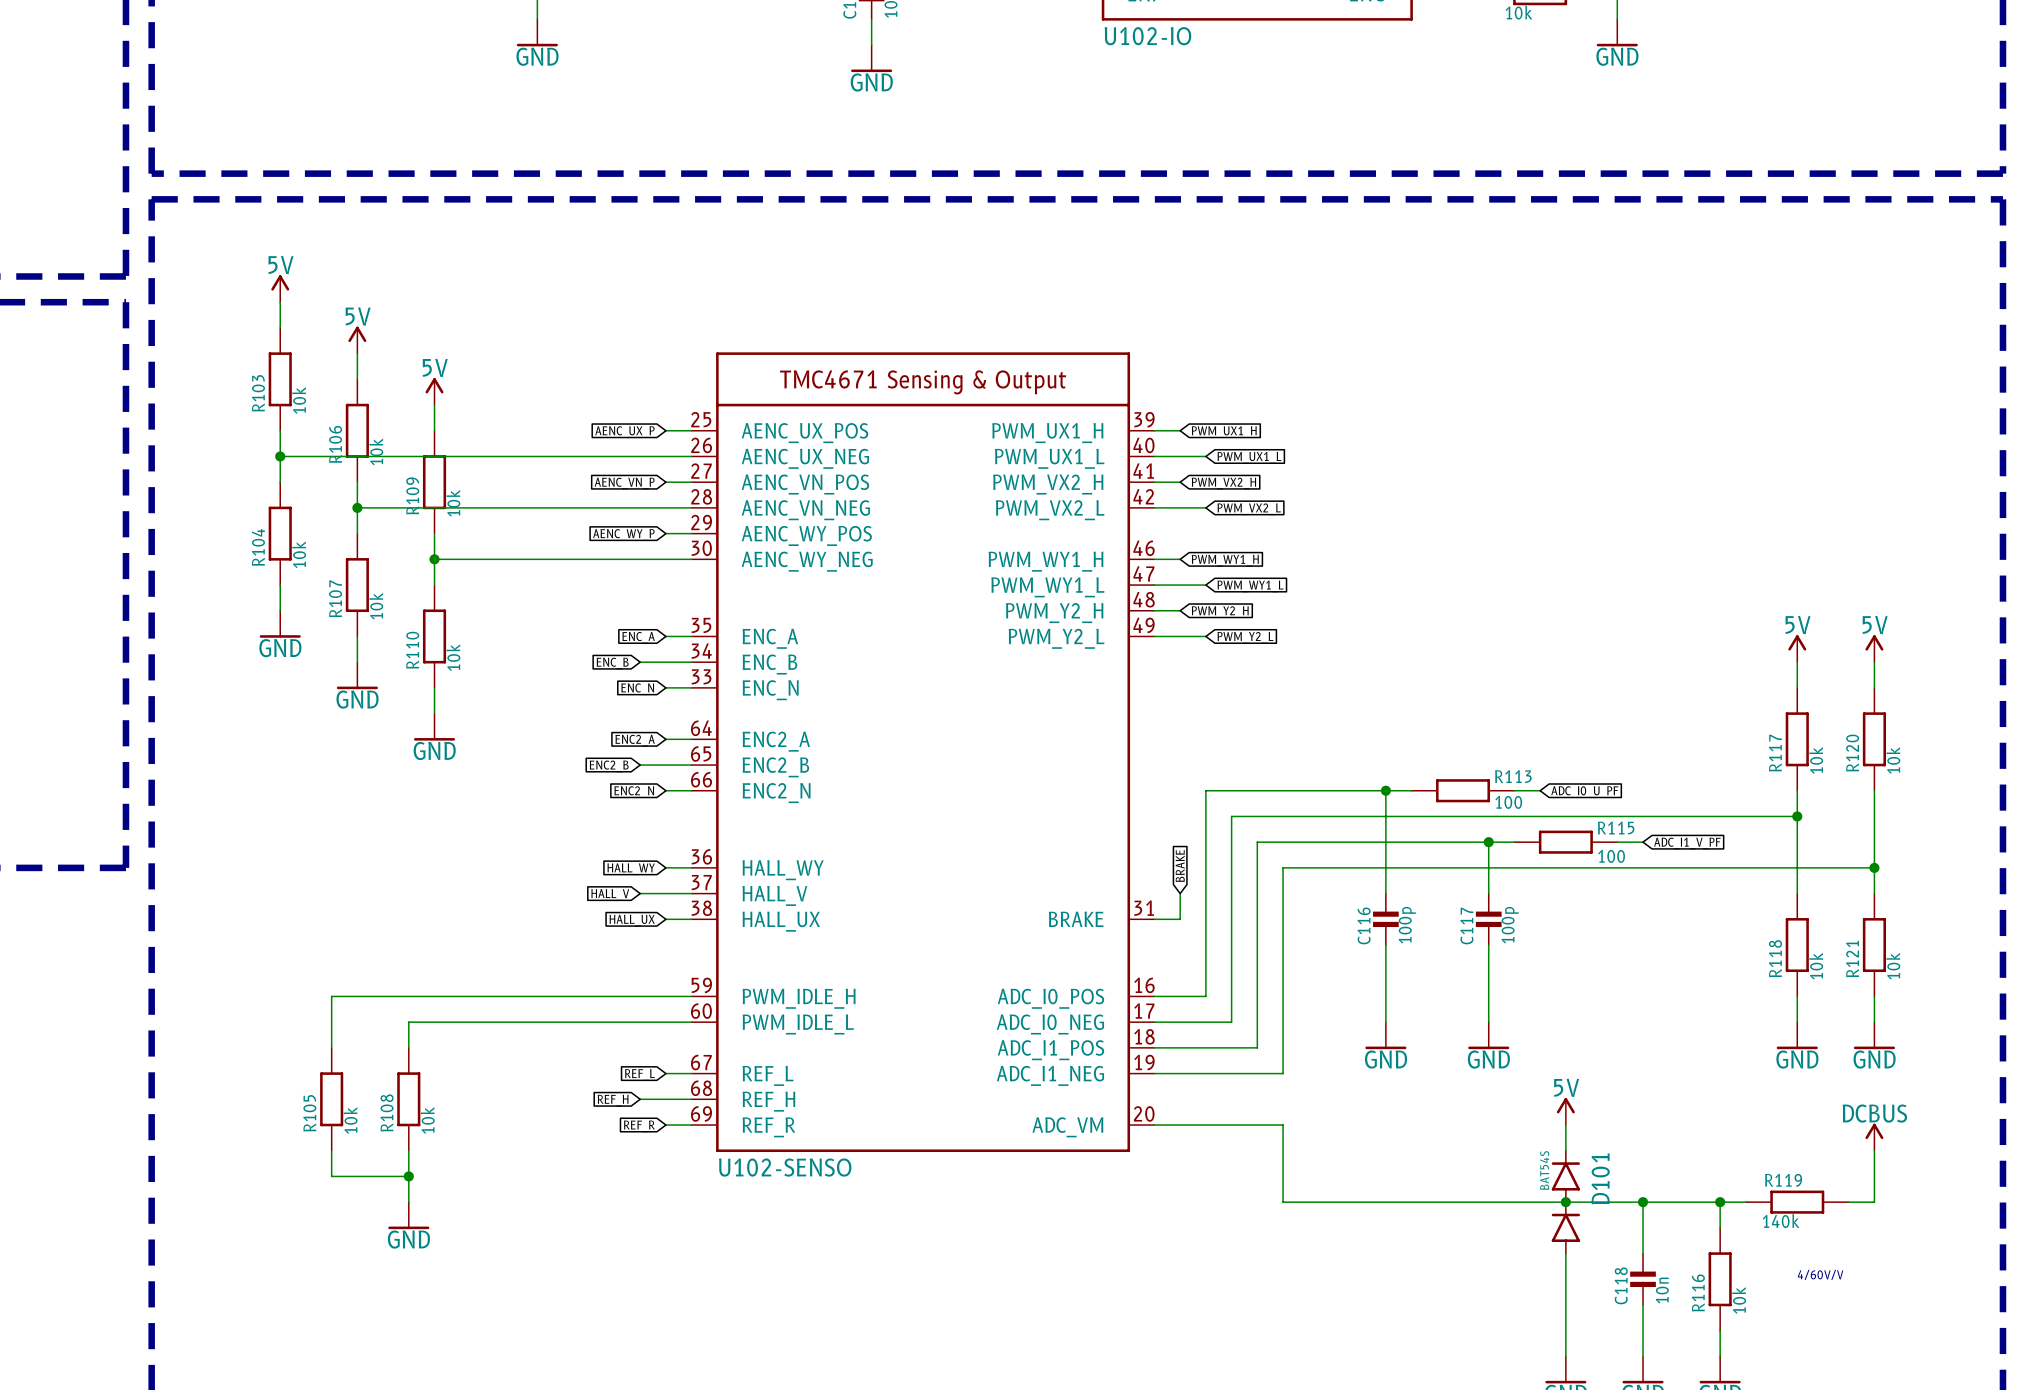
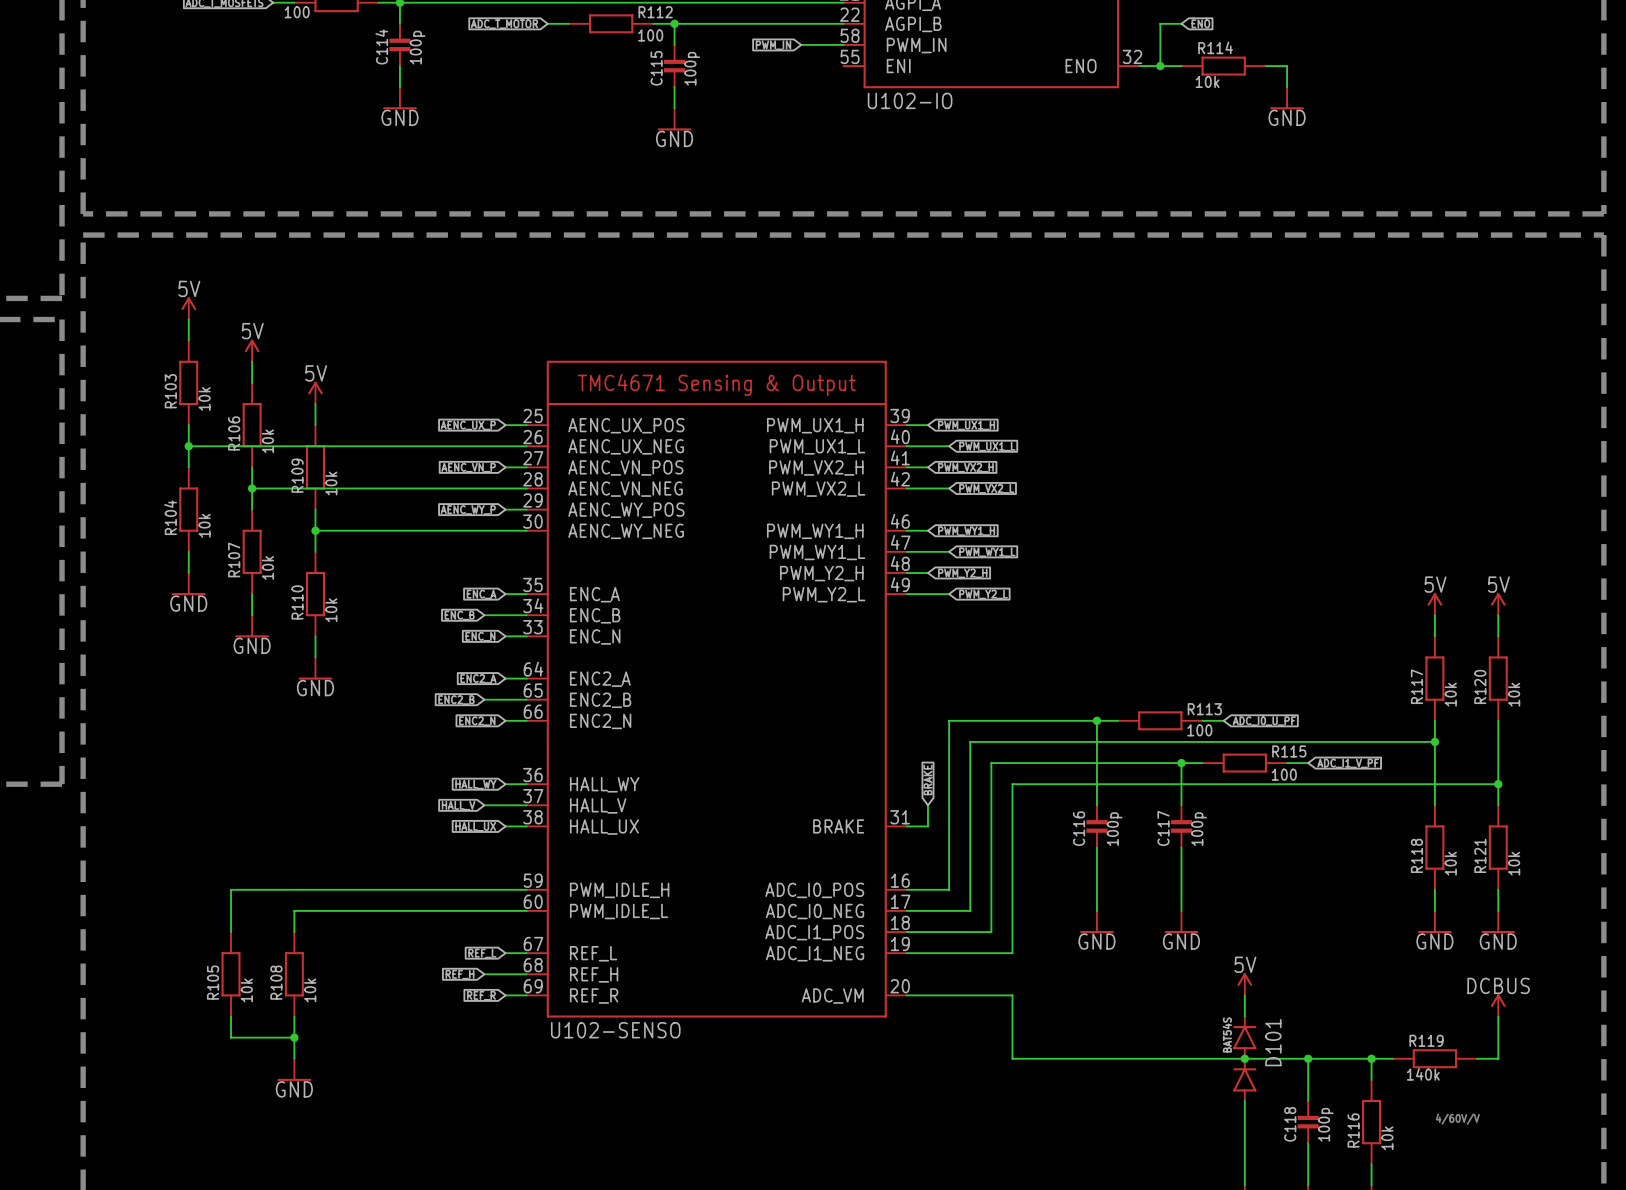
C118 value: 10n (1662, 1290) -> 100p (1325, 1124)

